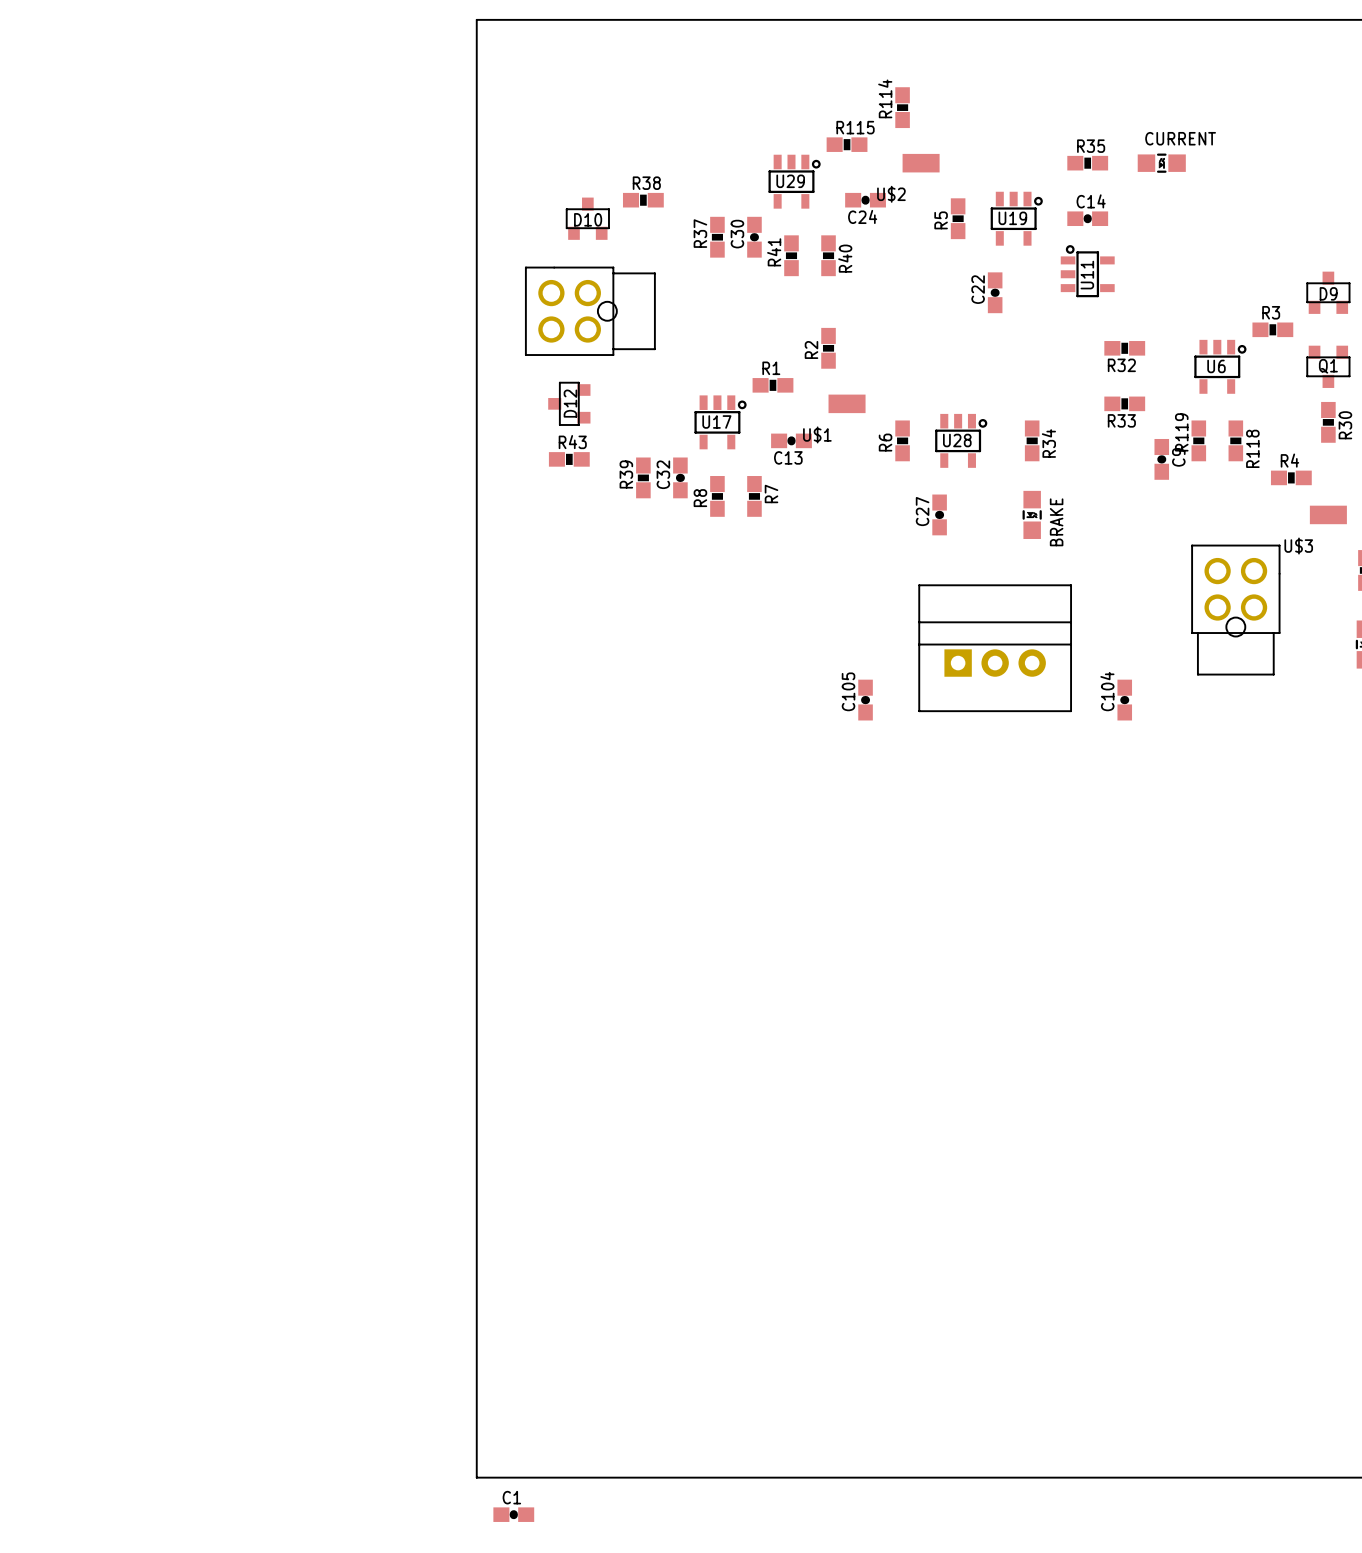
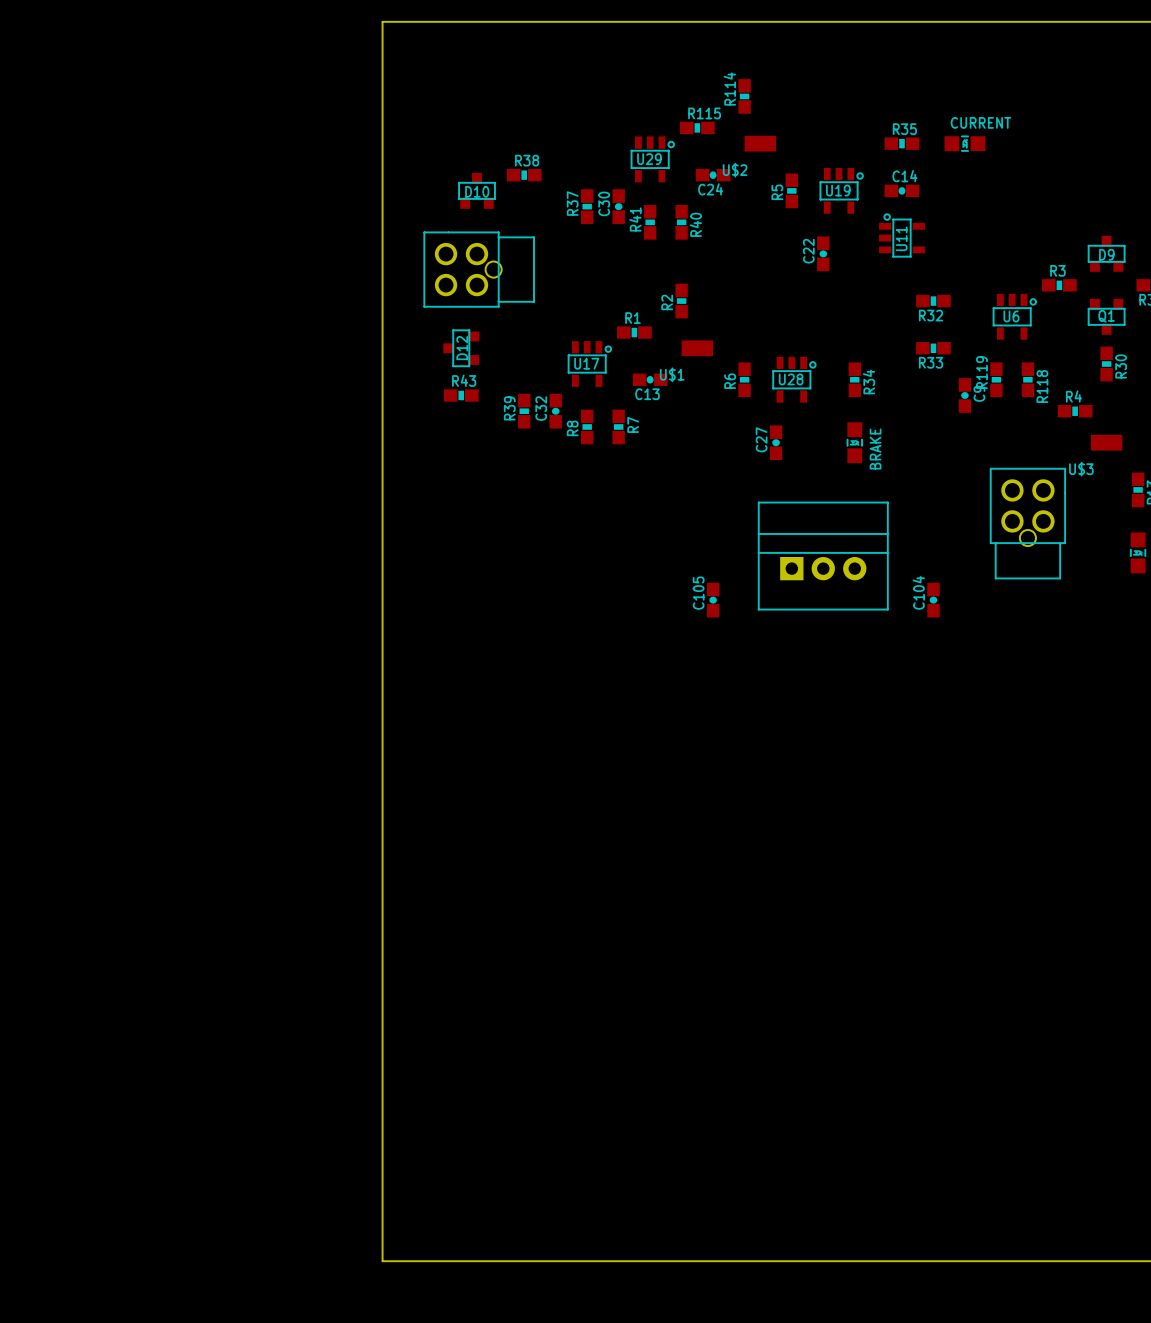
C1: (513, 1514) -> none

